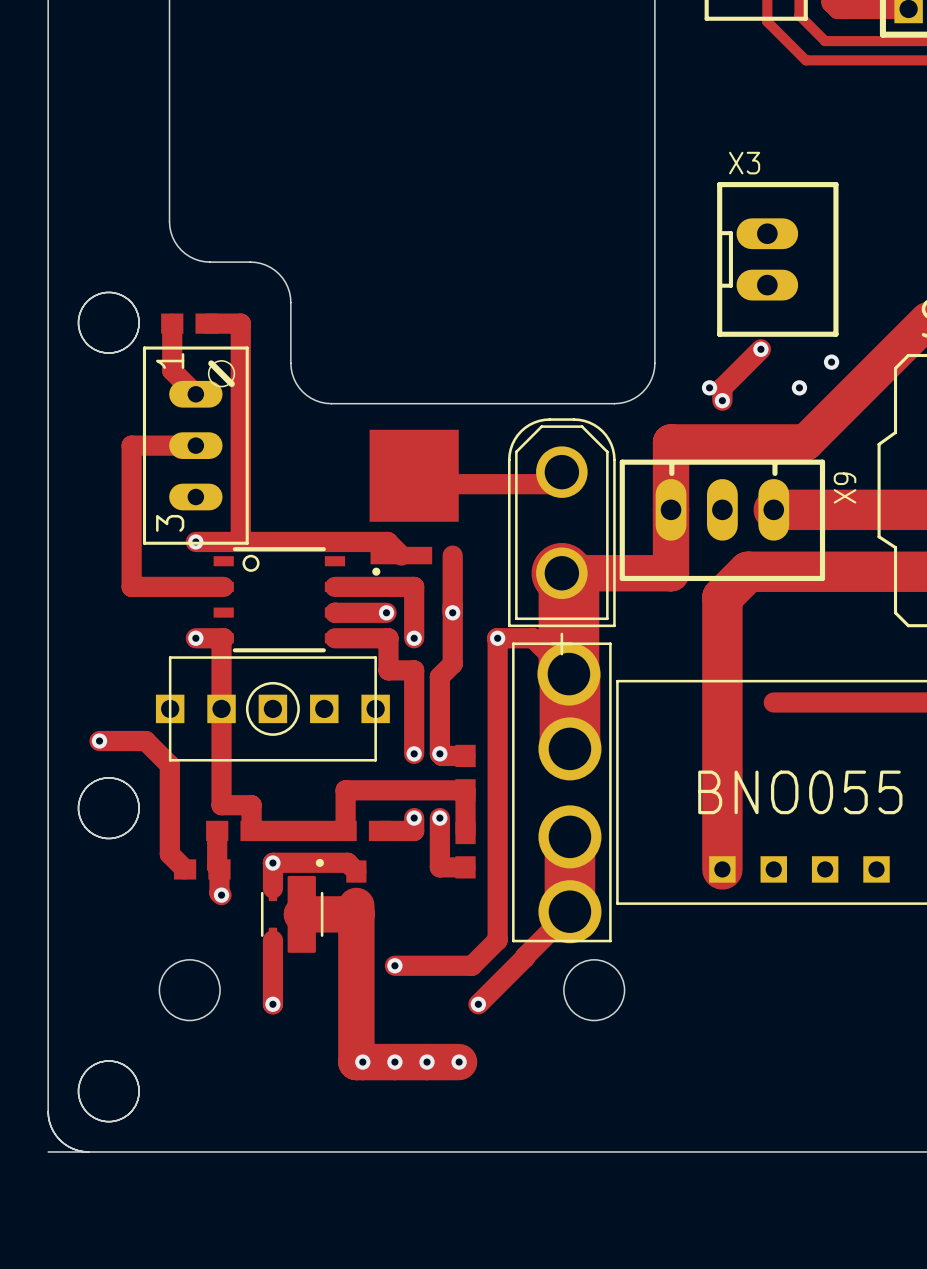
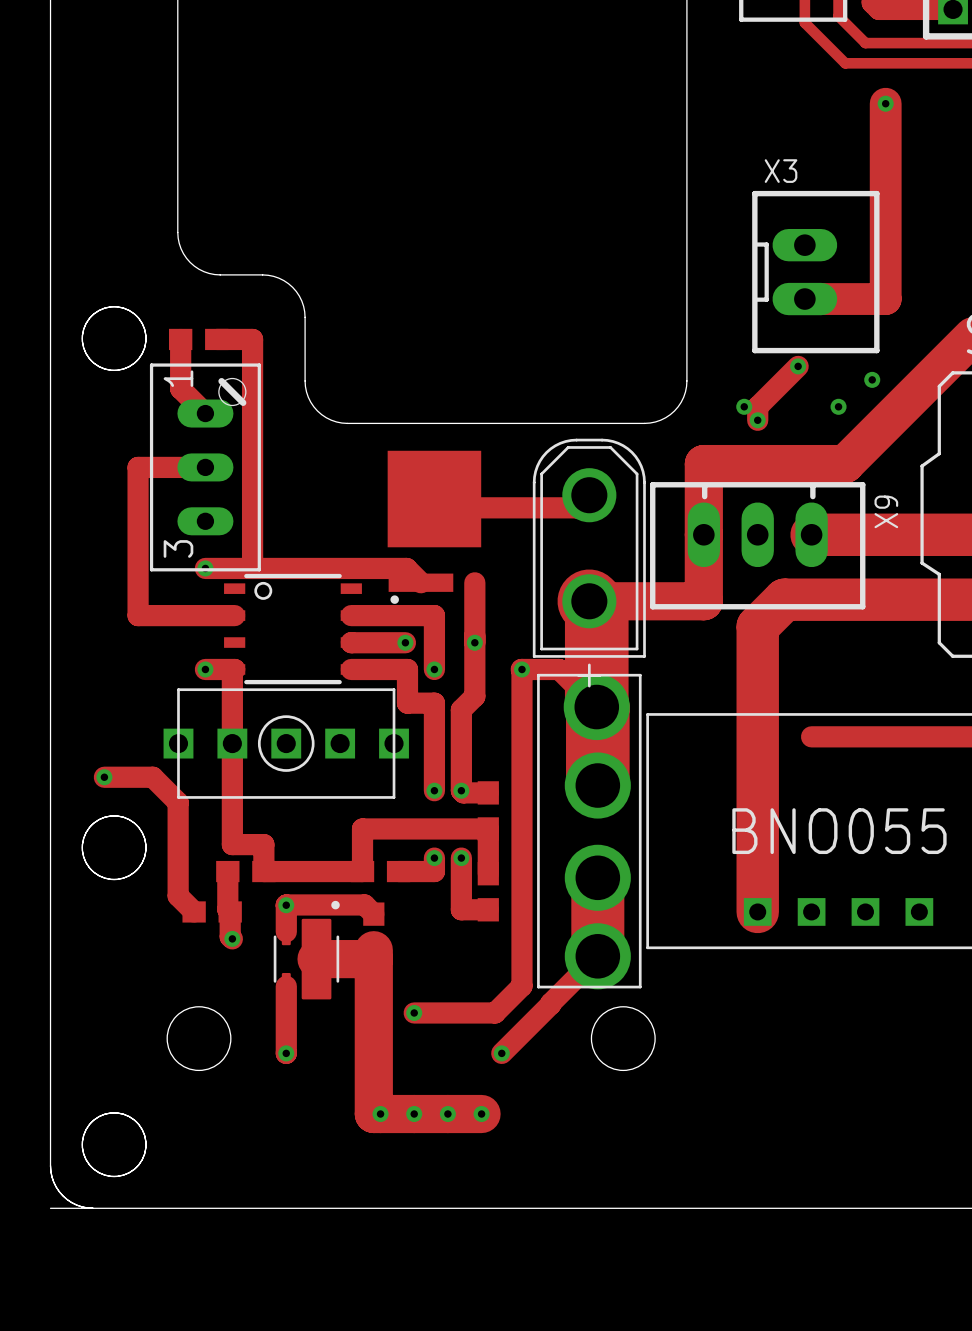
track: none -> (885, 103) (885, 299) (804, 299)
via: none -> (885, 103)

